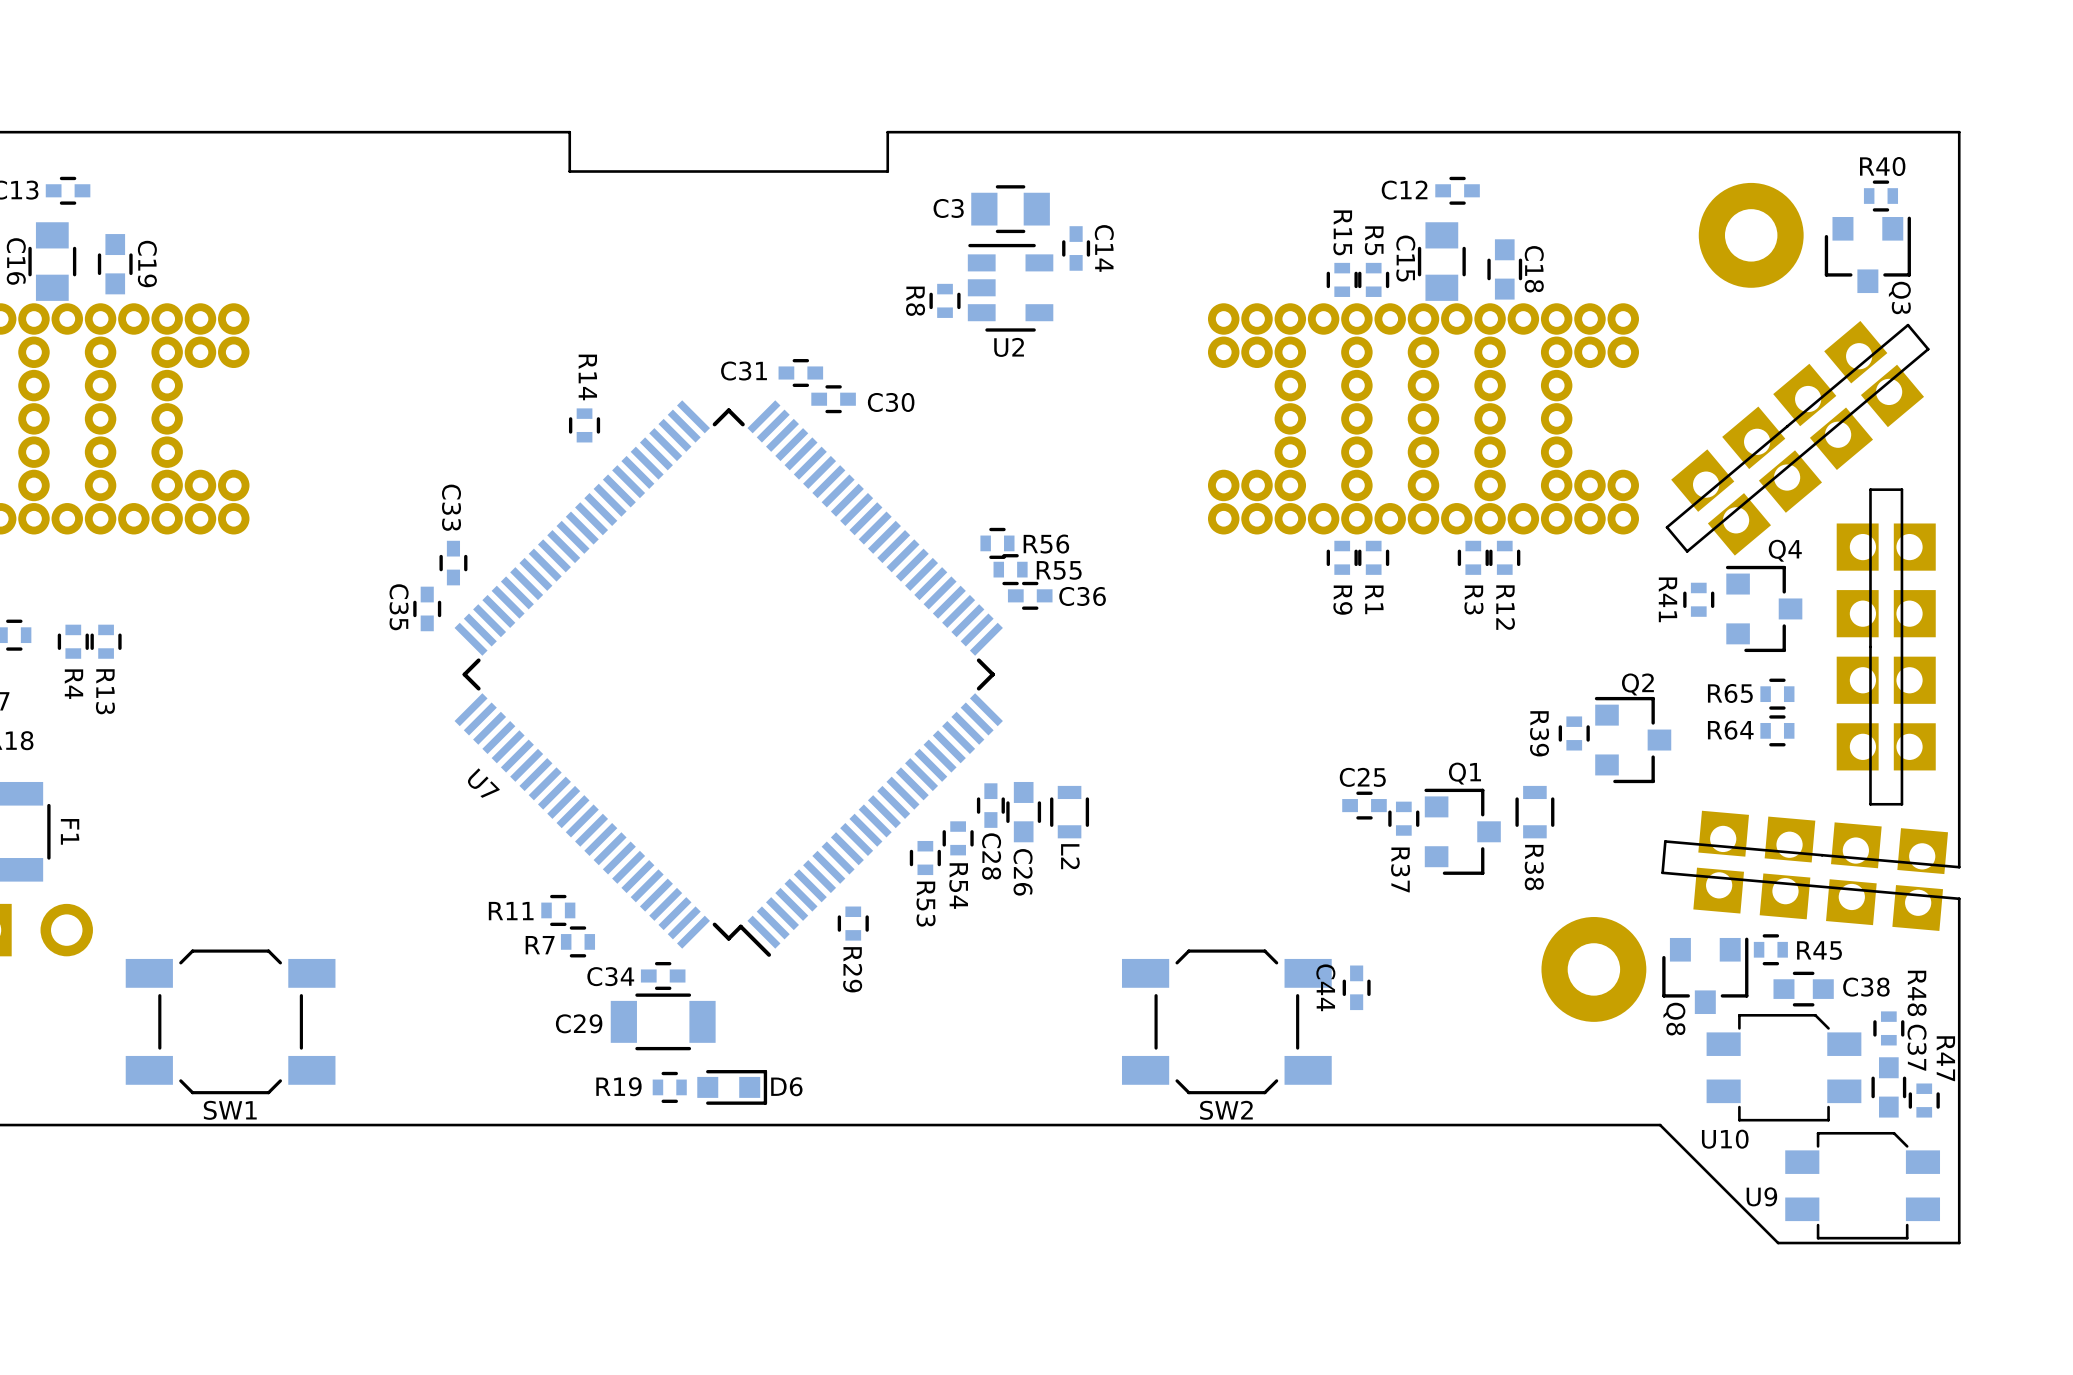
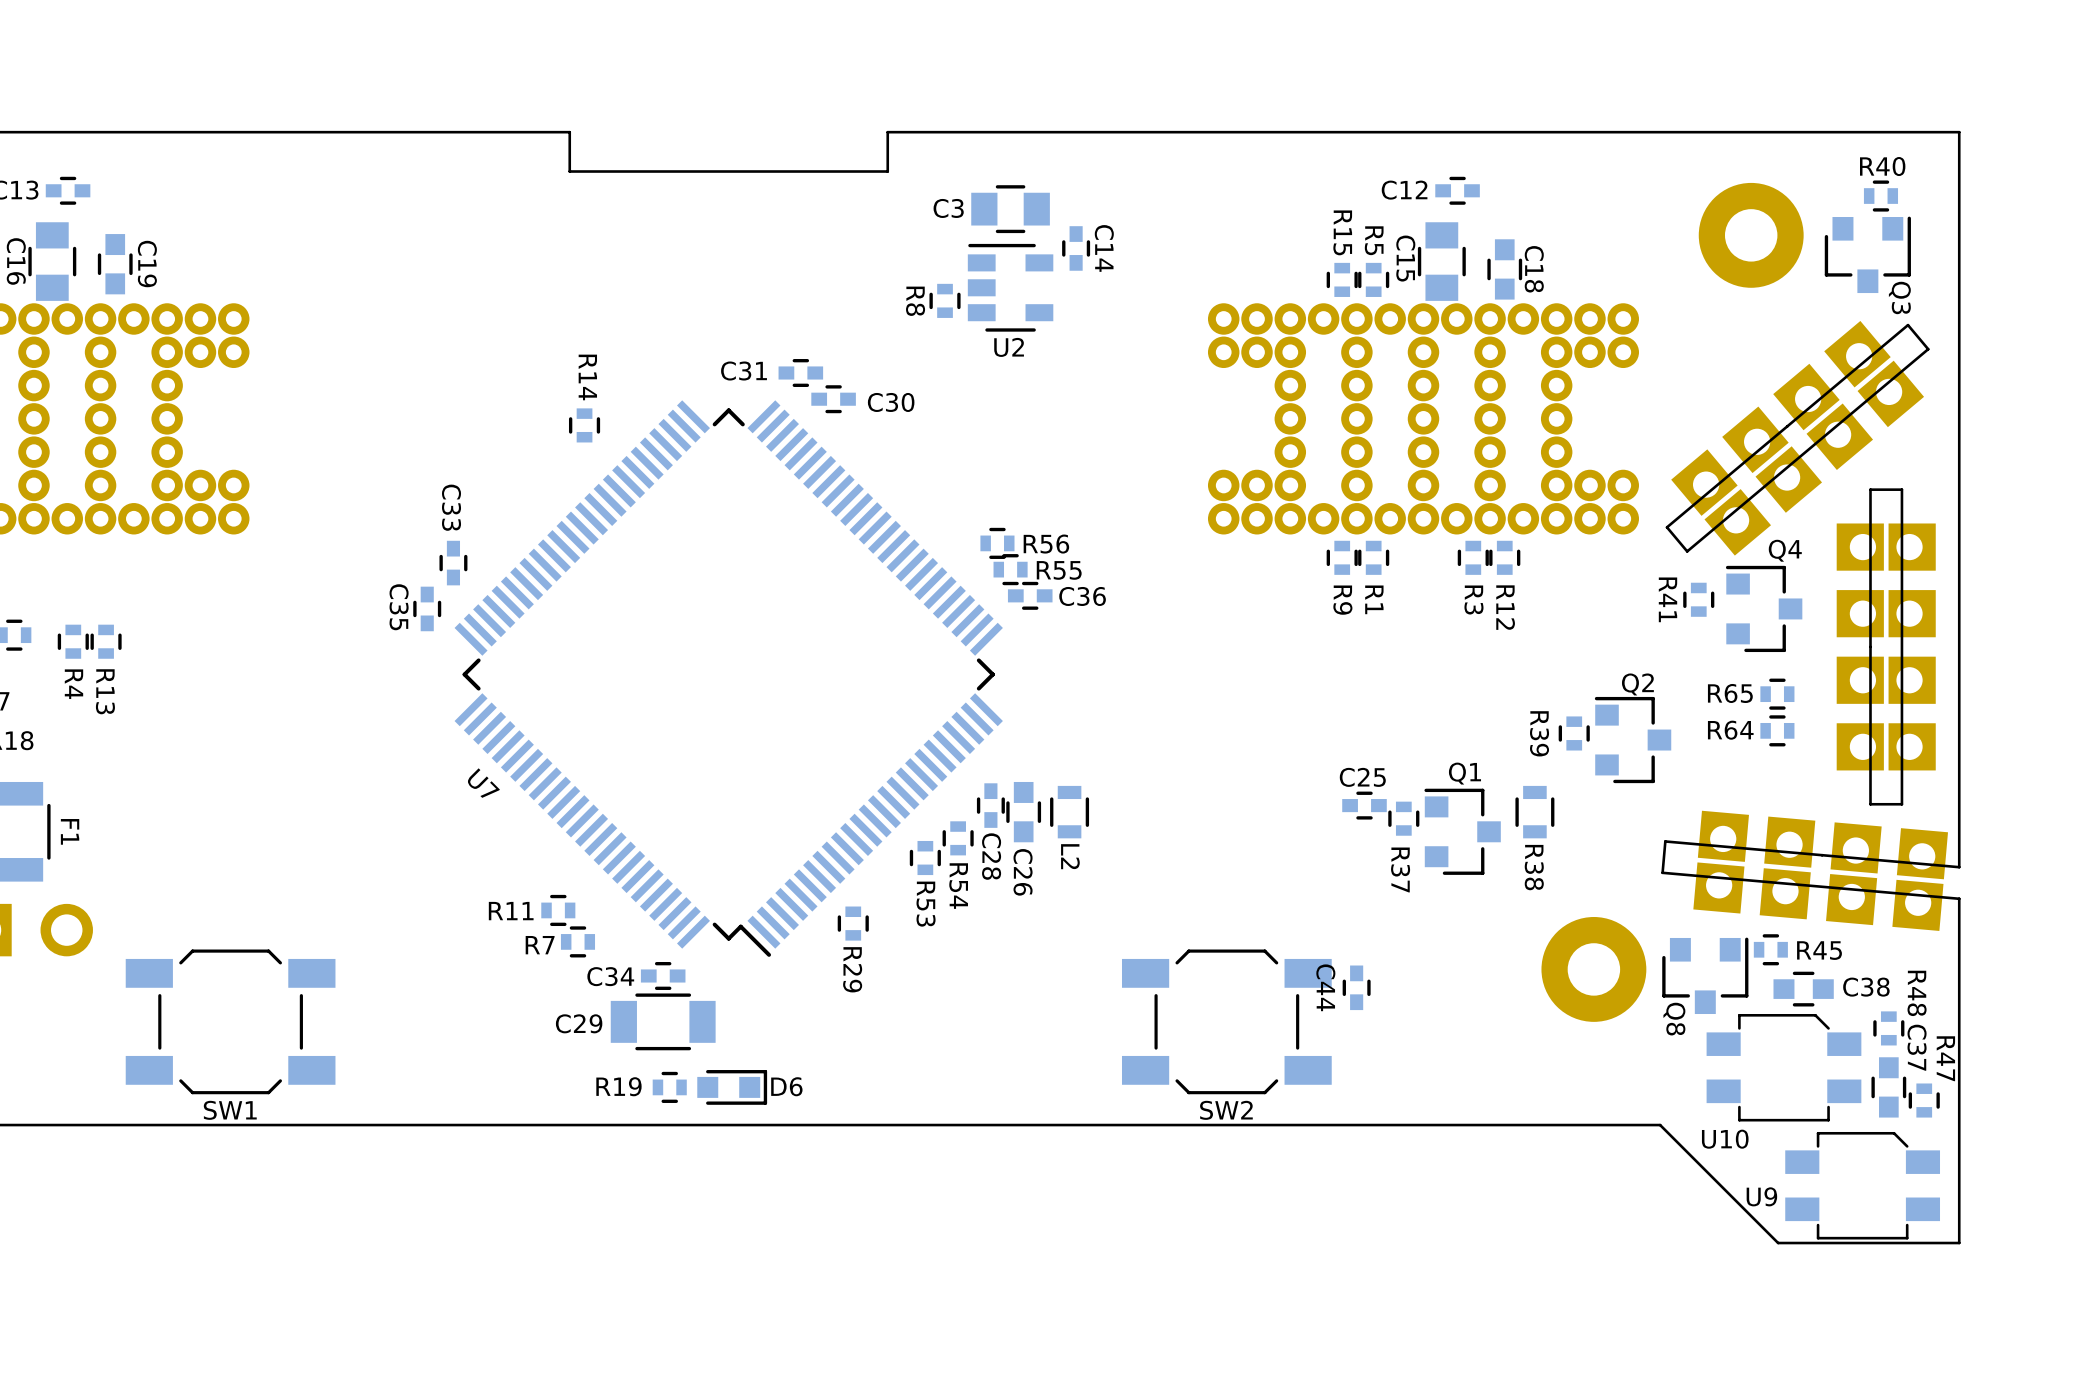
part footprint: [1671, 320, 1925, 556] -> [1671, 320, 1925, 556]
part footprint: [1836, 523, 1936, 771] -> [1836, 523, 1936, 771]
part footprint: [1693, 810, 1949, 931] -> [1693, 810, 1949, 931]

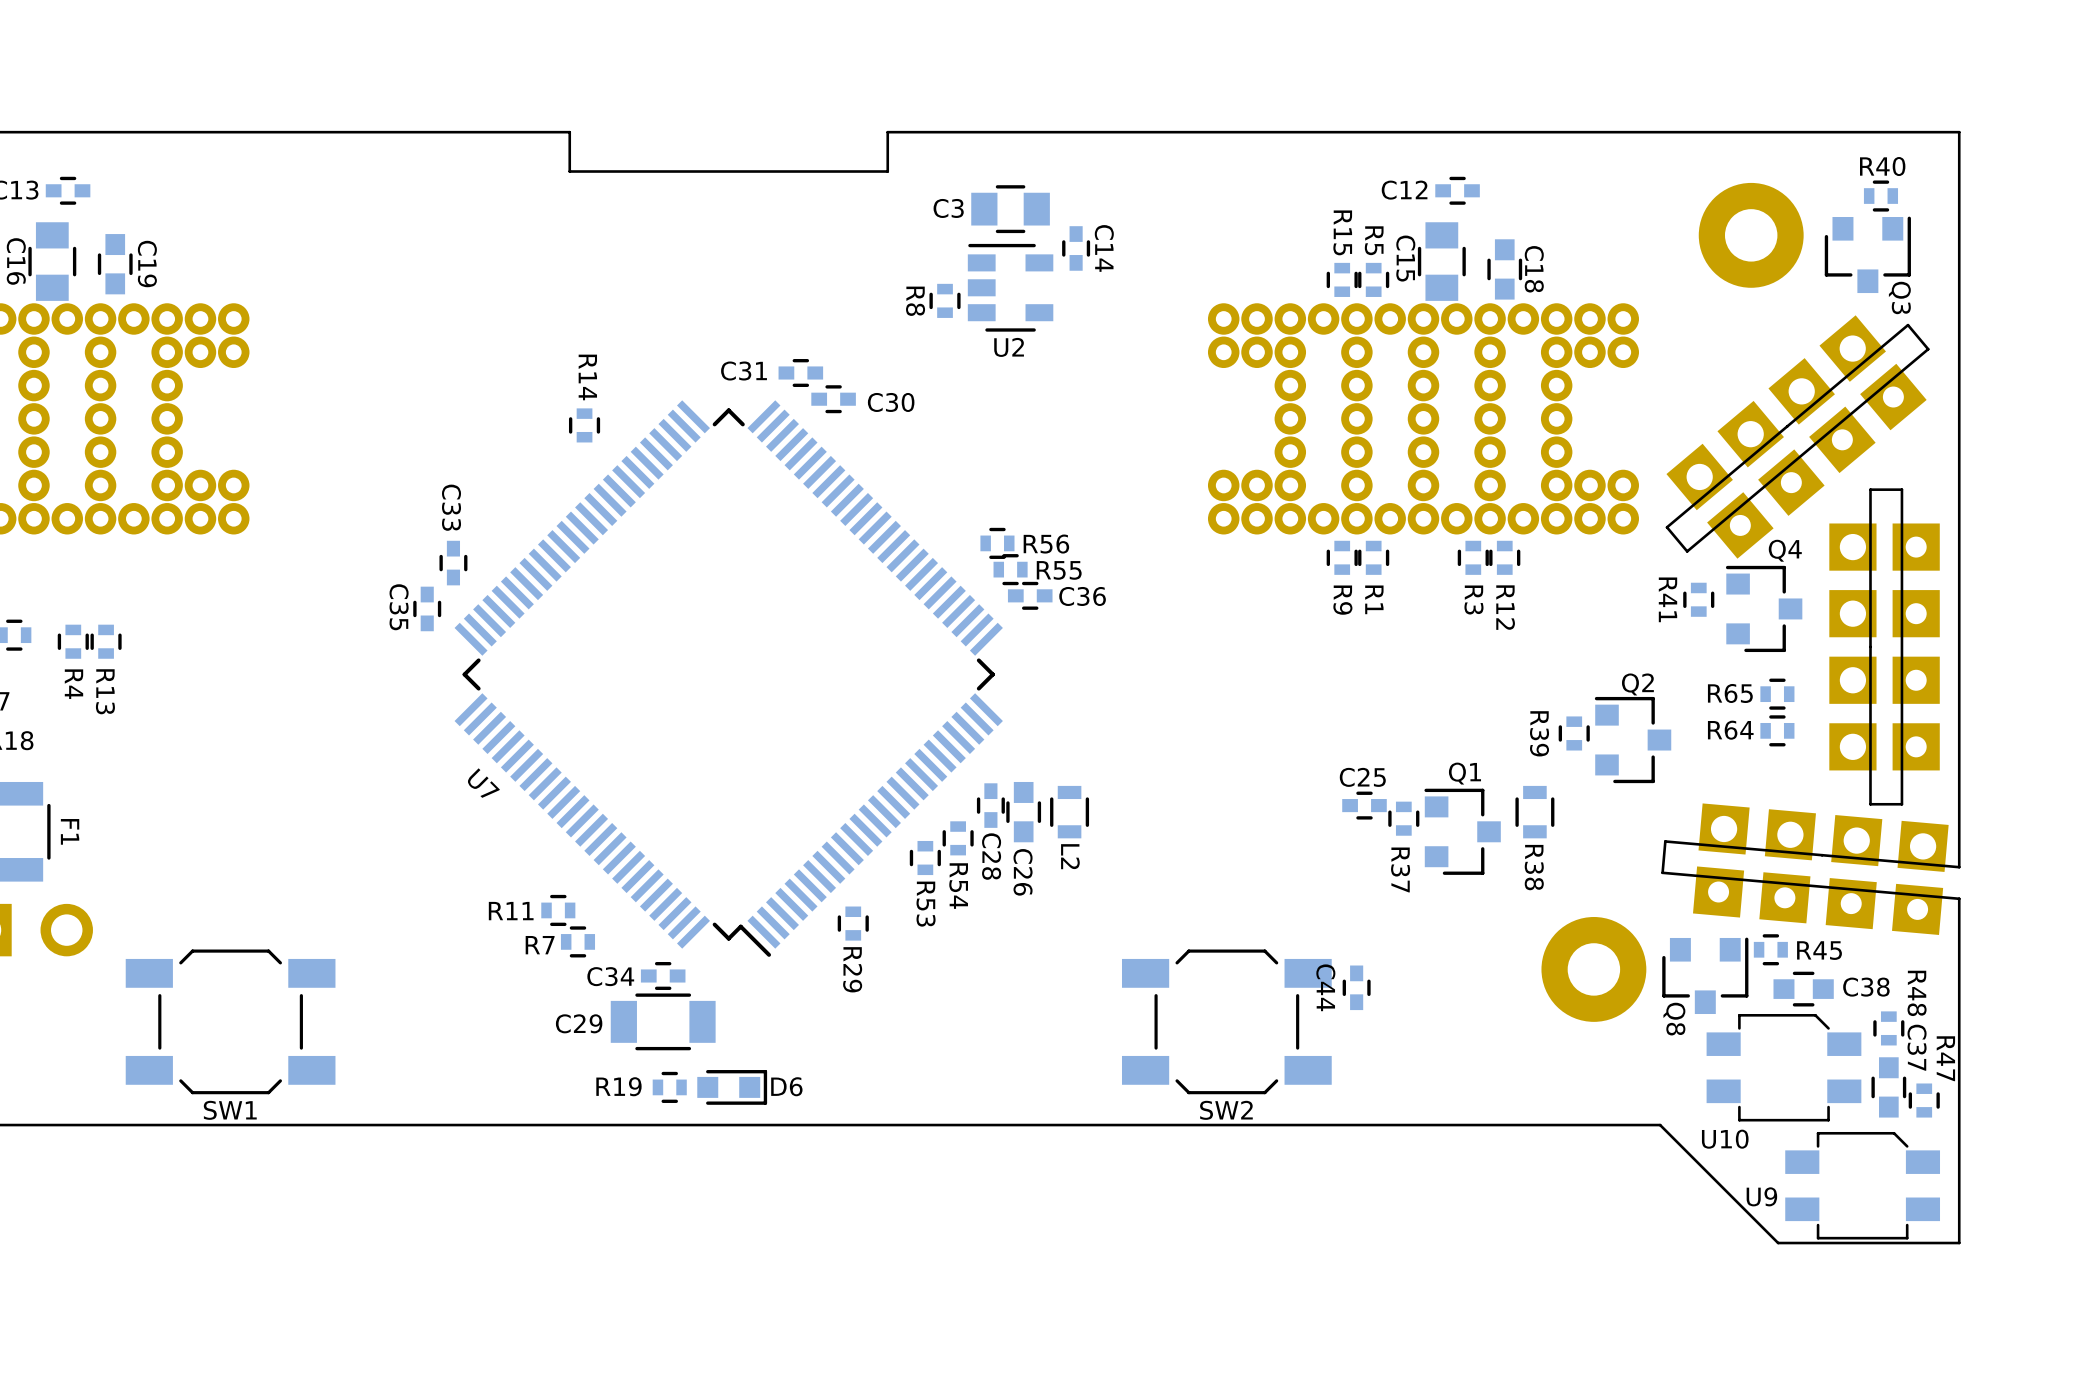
part footprint: [1671, 320, 1925, 556] -> [1666, 315, 1927, 559]
part footprint: [1836, 523, 1936, 771] -> [1829, 523, 1940, 771]
part footprint: [1693, 810, 1949, 931] -> [1693, 803, 1949, 935]

